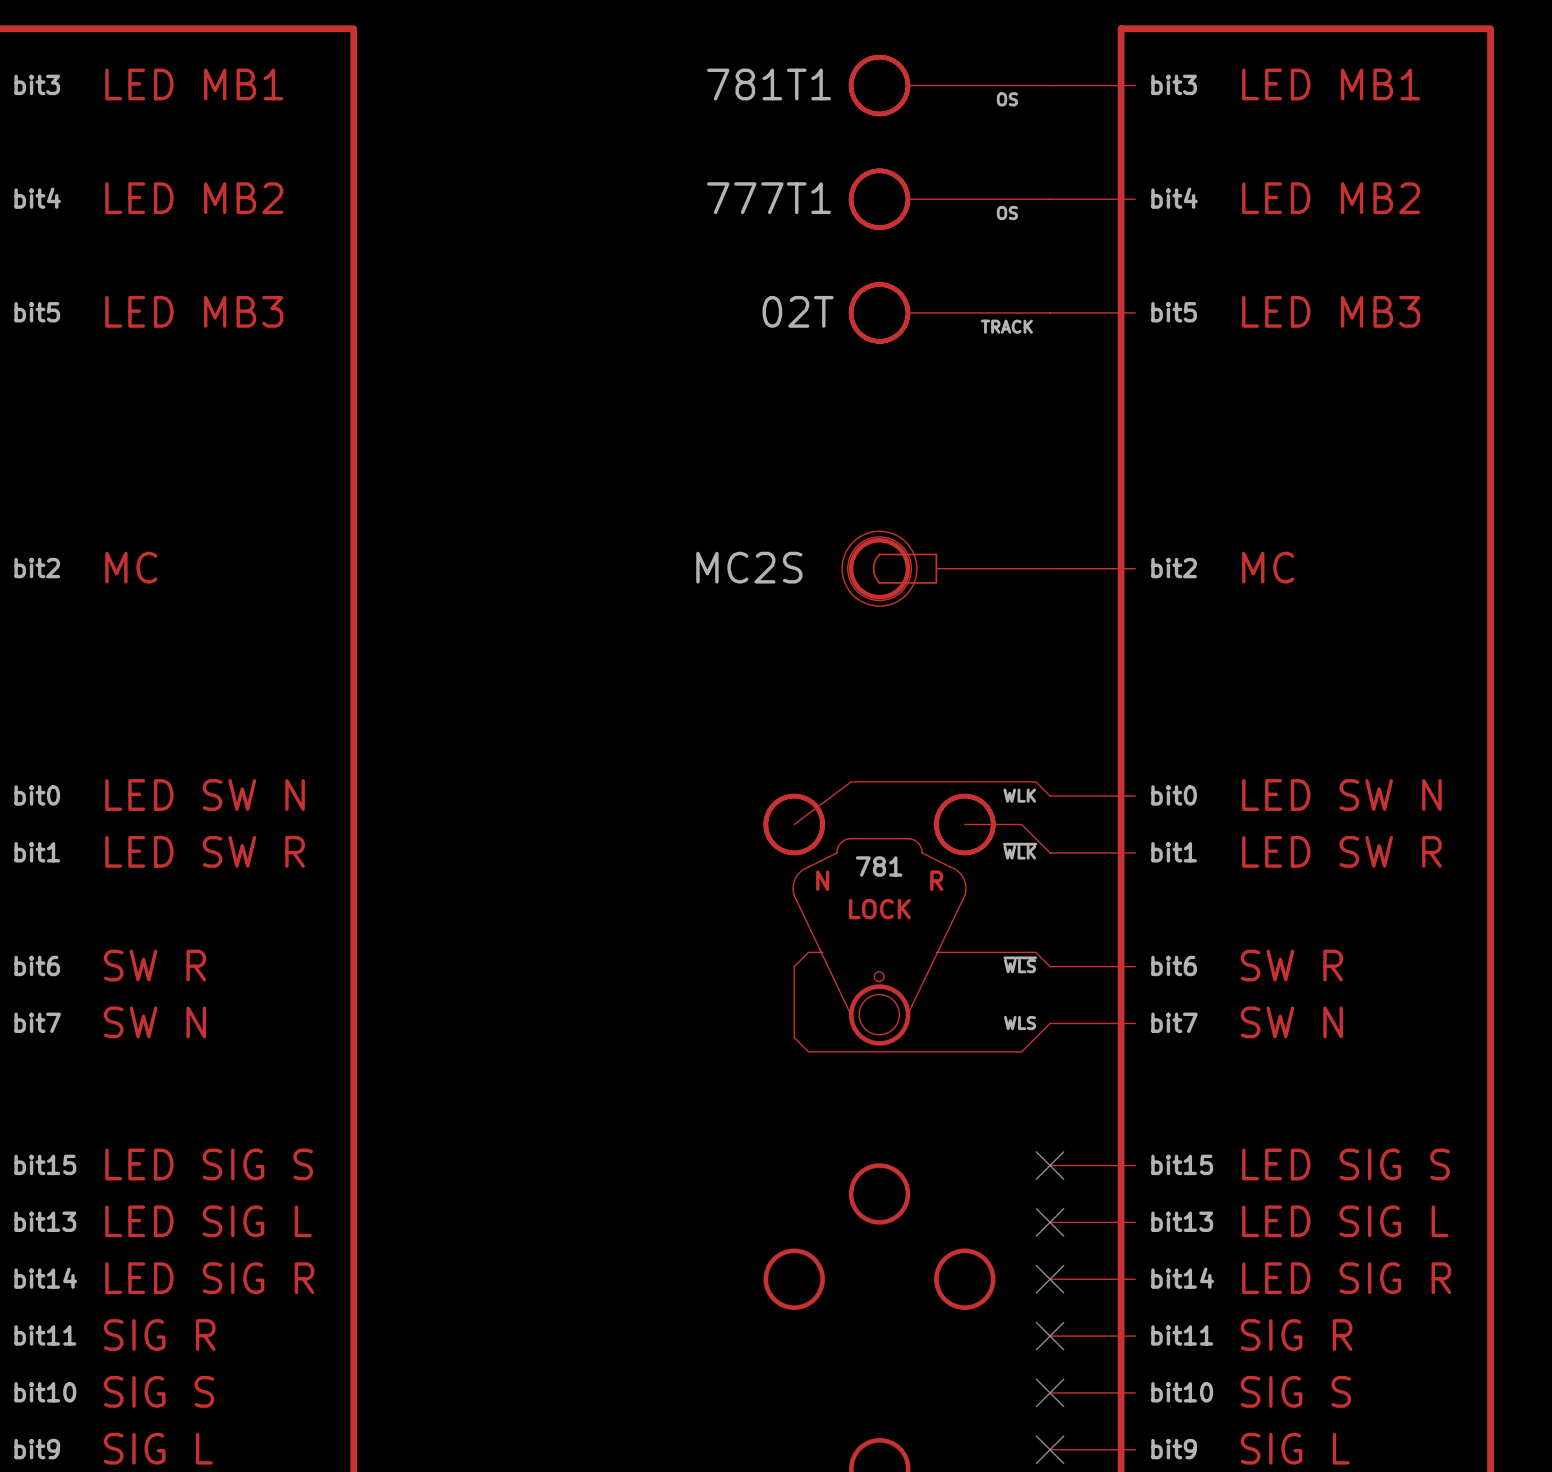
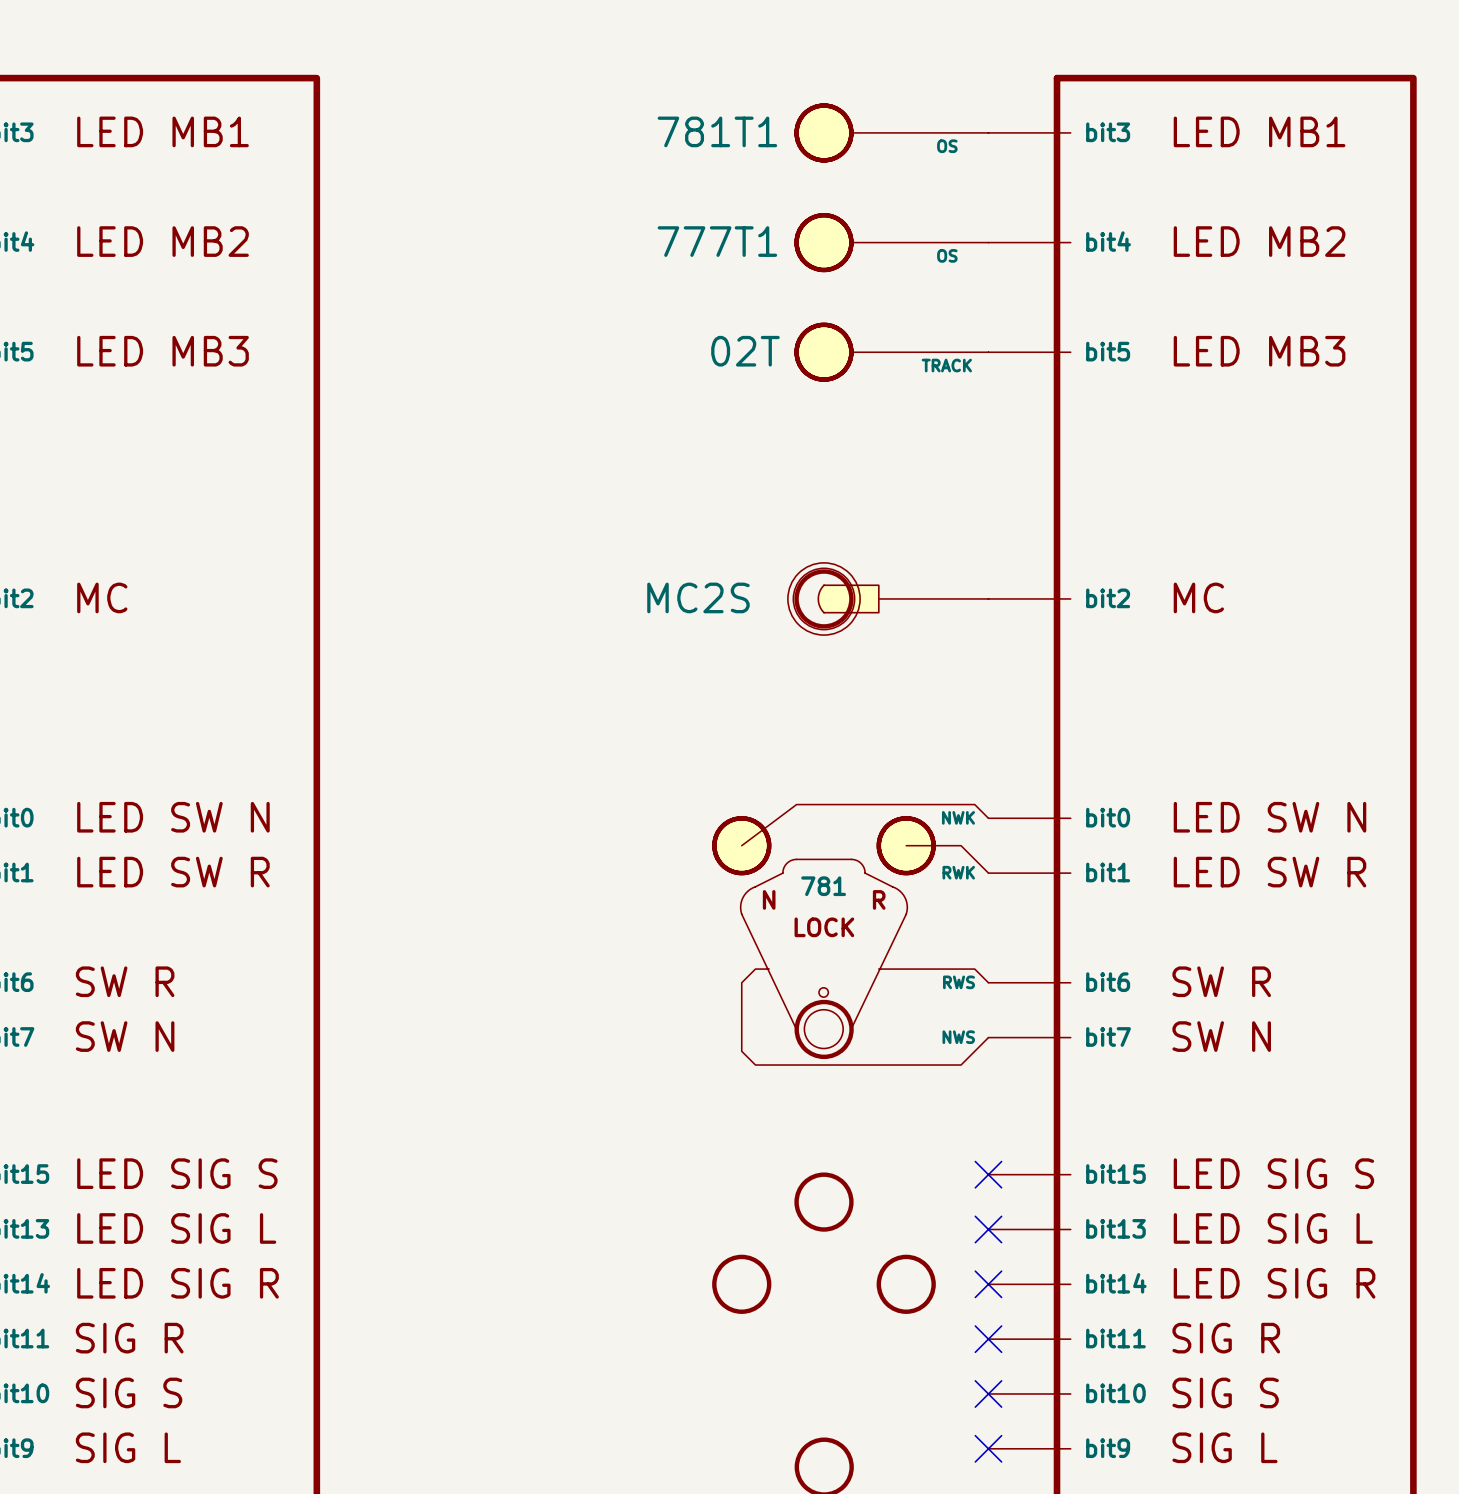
part pin name: WLK (1019, 795) -> NWK (958, 817)
part pin name: ~{WLK} (1020, 851) -> RWK (958, 872)
part pin name: ~{WLS} (1020, 964) -> RWS (958, 982)
part pin name: WLS (1020, 1023) -> NWS (958, 1037)

